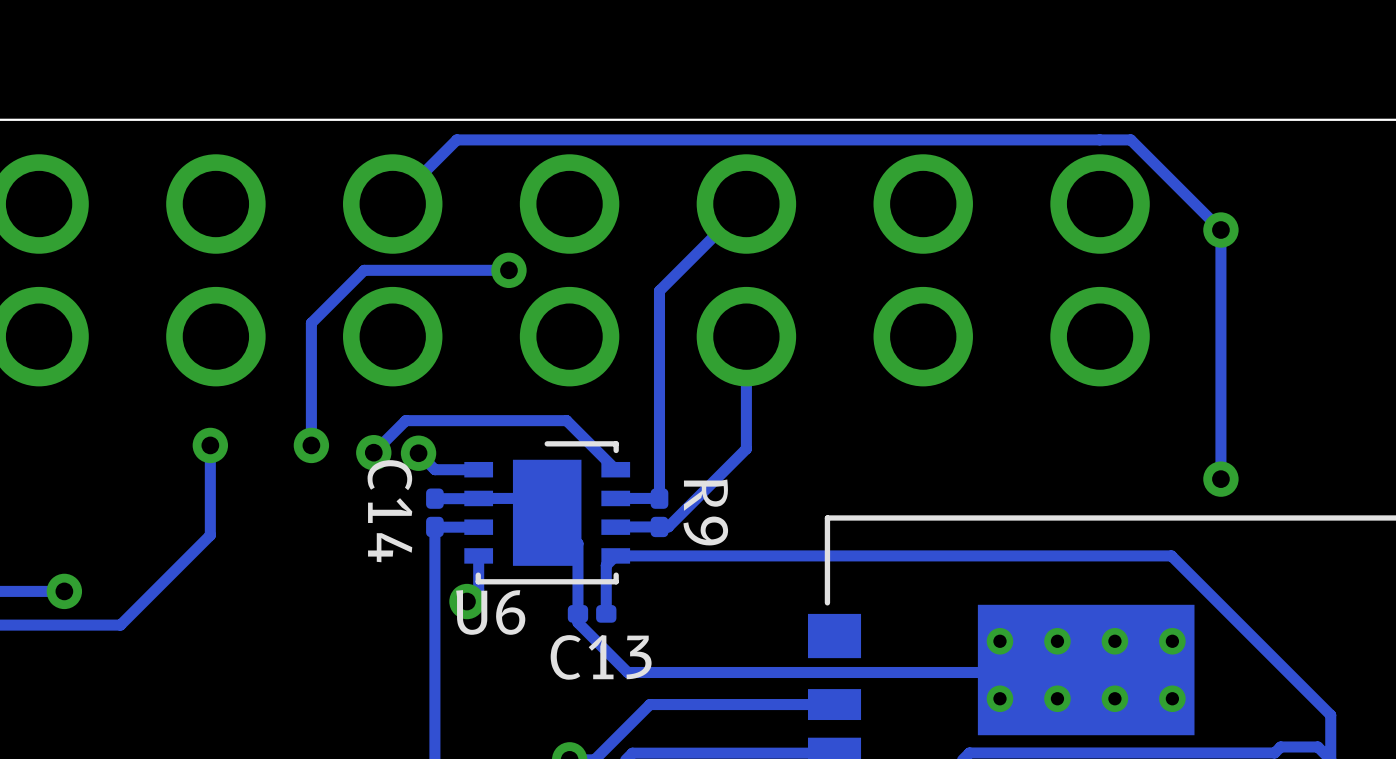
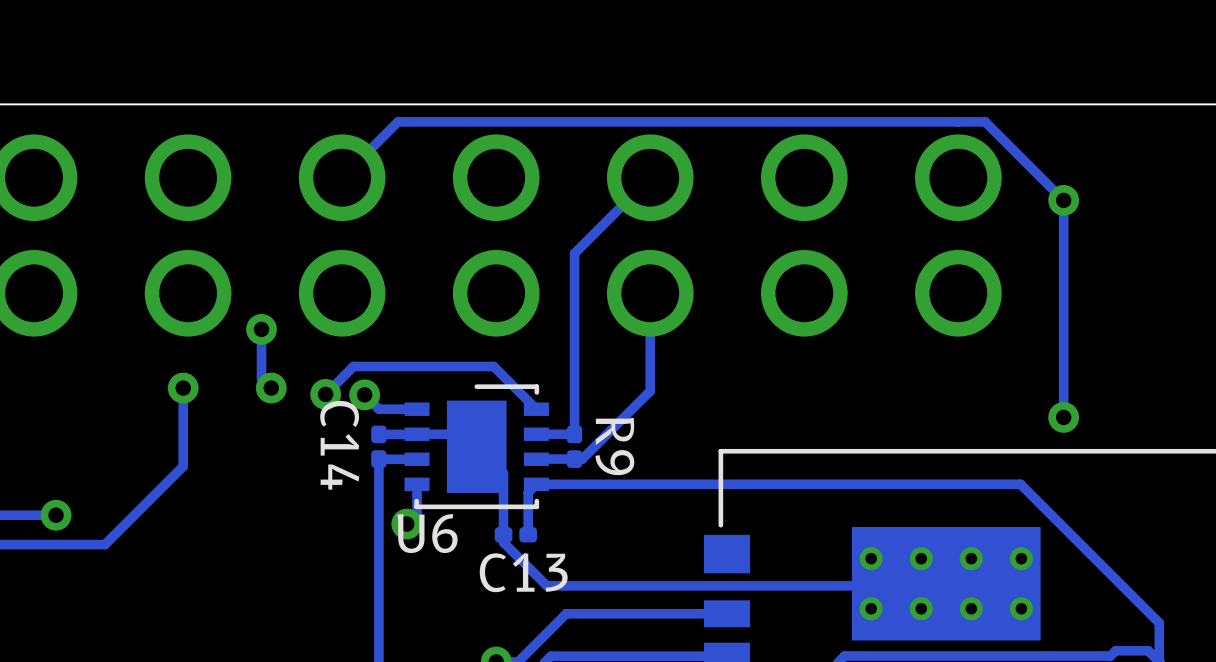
track: (508, 270) (364, 270) (311, 323) (311, 445) -> (261, 329) (261, 378) (271, 388)
via position: (508, 270) -> (261, 329)

